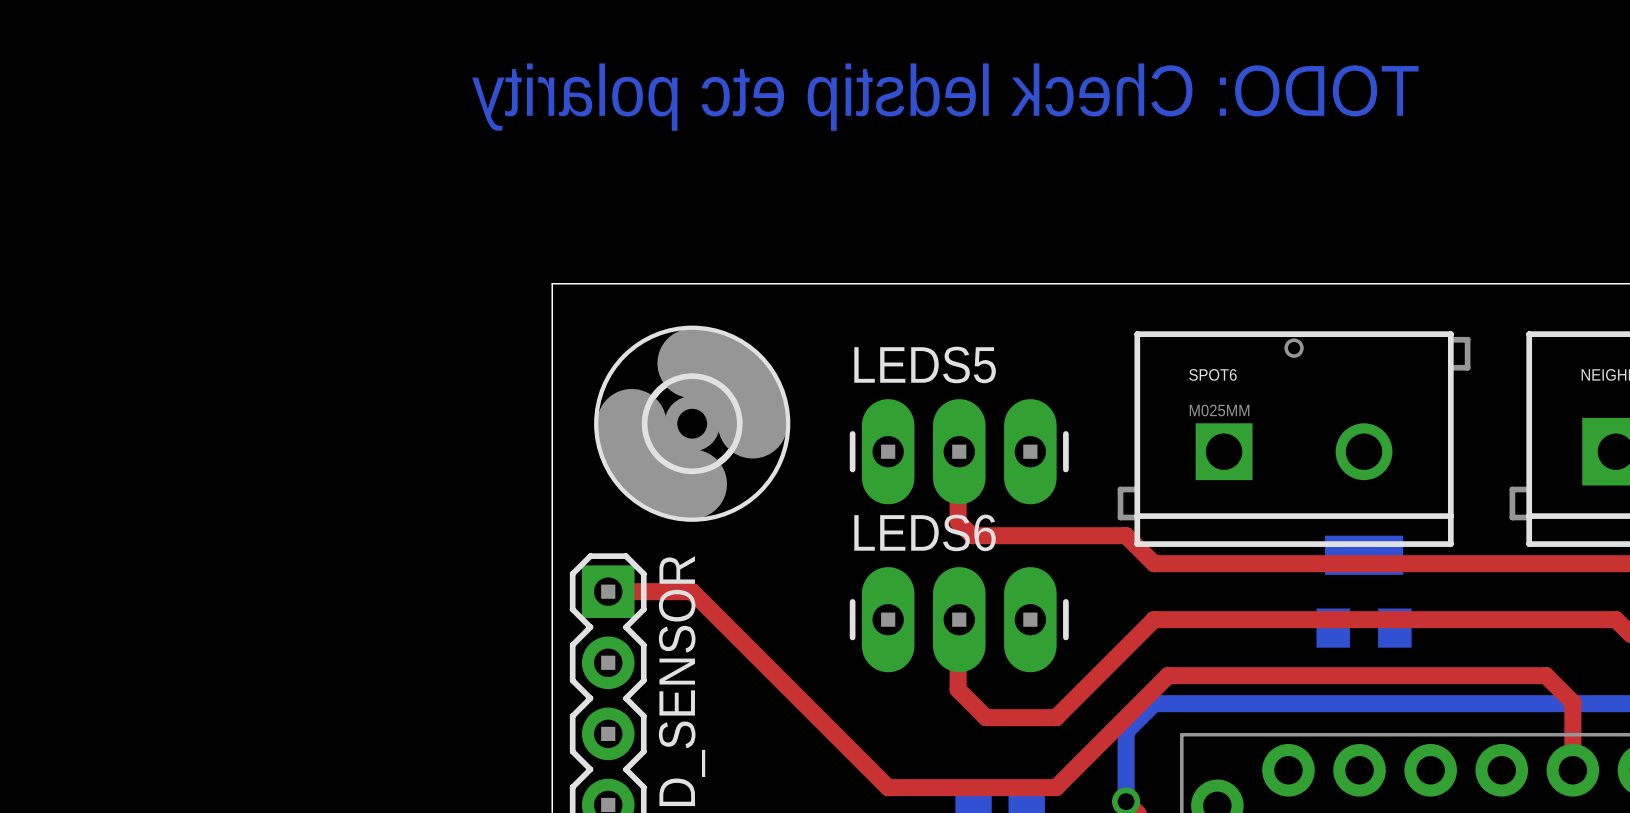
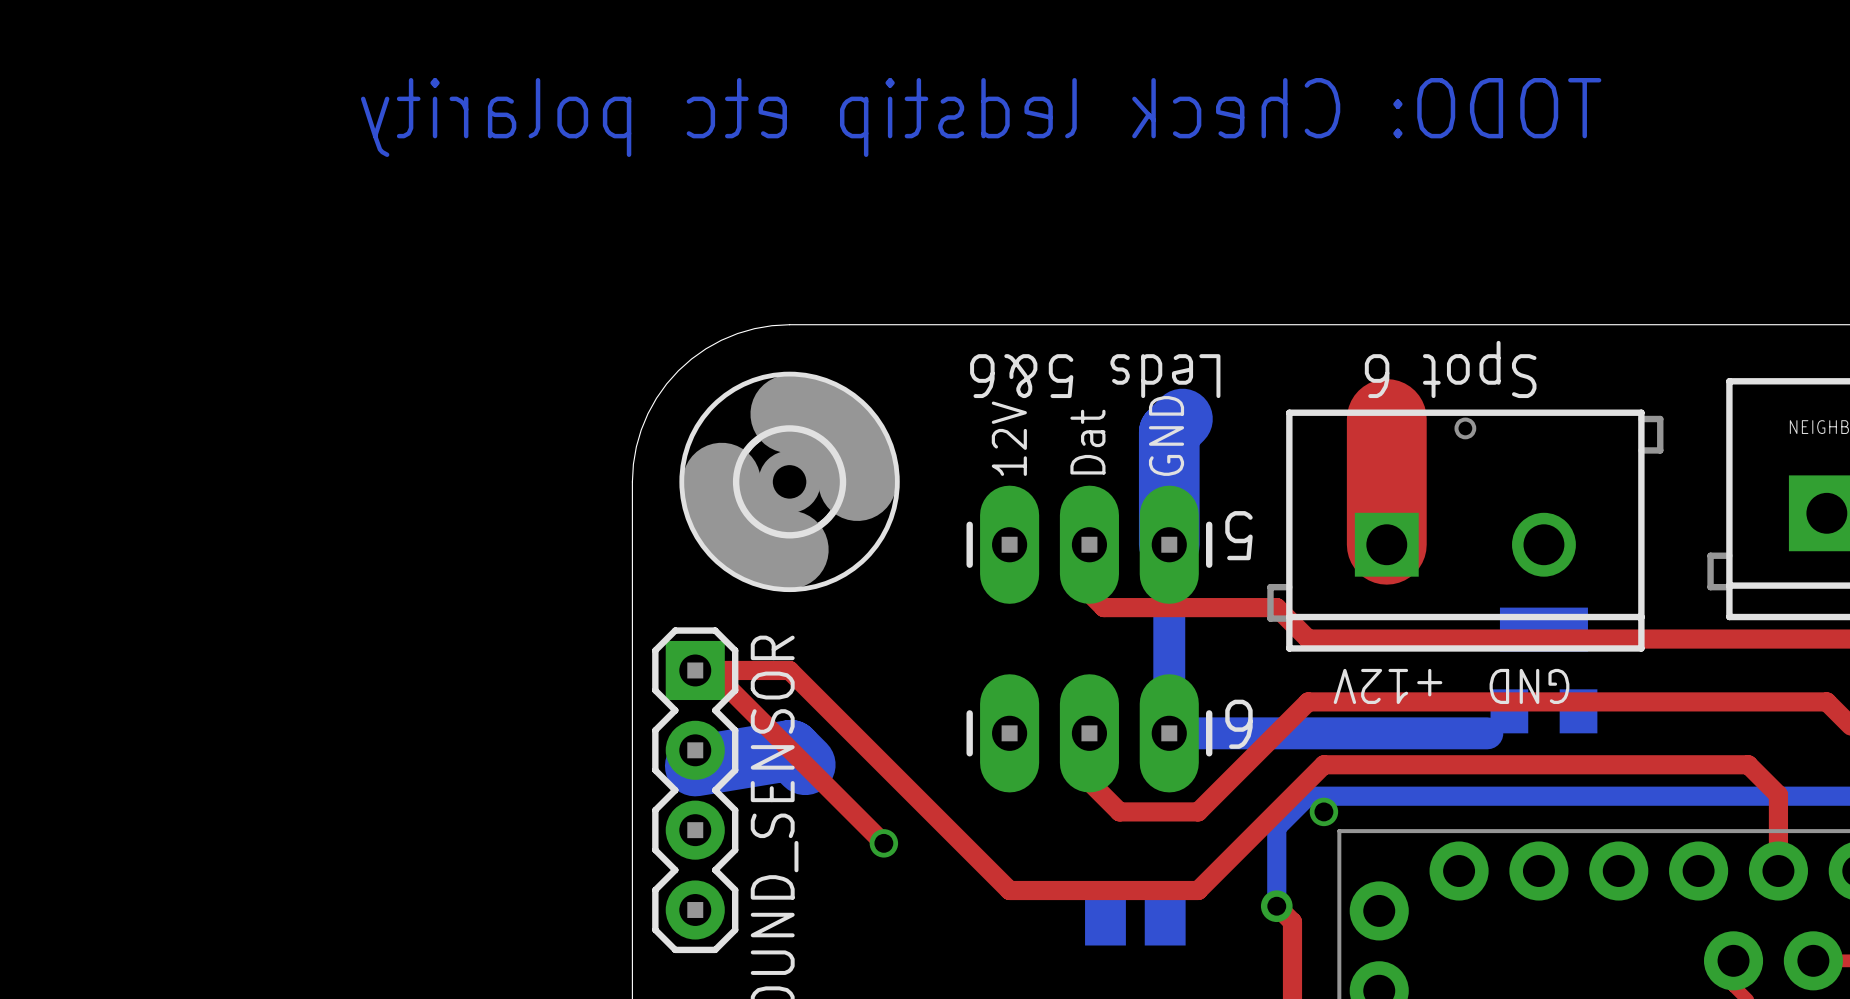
board edge: (692, 283) (552, 283) (552, 423) -> (789, 324) (771, 325) (737, 333) (705, 348) (678, 370) (656, 398) (641, 429) (633, 464) (632, 481)
text: none -> Spot 6 (1450, 369)
text: none -> Leds 5&6 (1095, 376)
LEDS5 name: LEDS5 (925, 364) -> none
bottom track: none -> (1182, 419) (1169, 432) (1169, 733) (1487, 733)
top track: none -> (1386, 419) (1386, 544)
SPOT6 name: SPOT6 (1212, 374) -> none
text: none -> GND (1166, 435)
text: none -> 12V (1009, 438)
text: none -> Dat (1087, 442)
SPOT6 value: M025MM (1219, 410) -> none
SPOT6 position: (1294, 439) -> (1465, 530)
LEDS5 position: (959, 451) -> (1089, 544)
text: none -> 5 (1238, 535)
LEDS6 name: LEDS6 (925, 532) -> none
top track: none -> (695, 686) (726, 686) (883, 843)
text: none -> GND (1529, 686)
text: none -> +12V (1388, 686)
LEDS6 position: (959, 619) -> (1089, 733)
text: none -> 6 (1238, 724)
bottom track: none -> (805, 764) (790, 750) (695, 766)
via: none -> (1323, 811)
via: none -> (883, 843)

